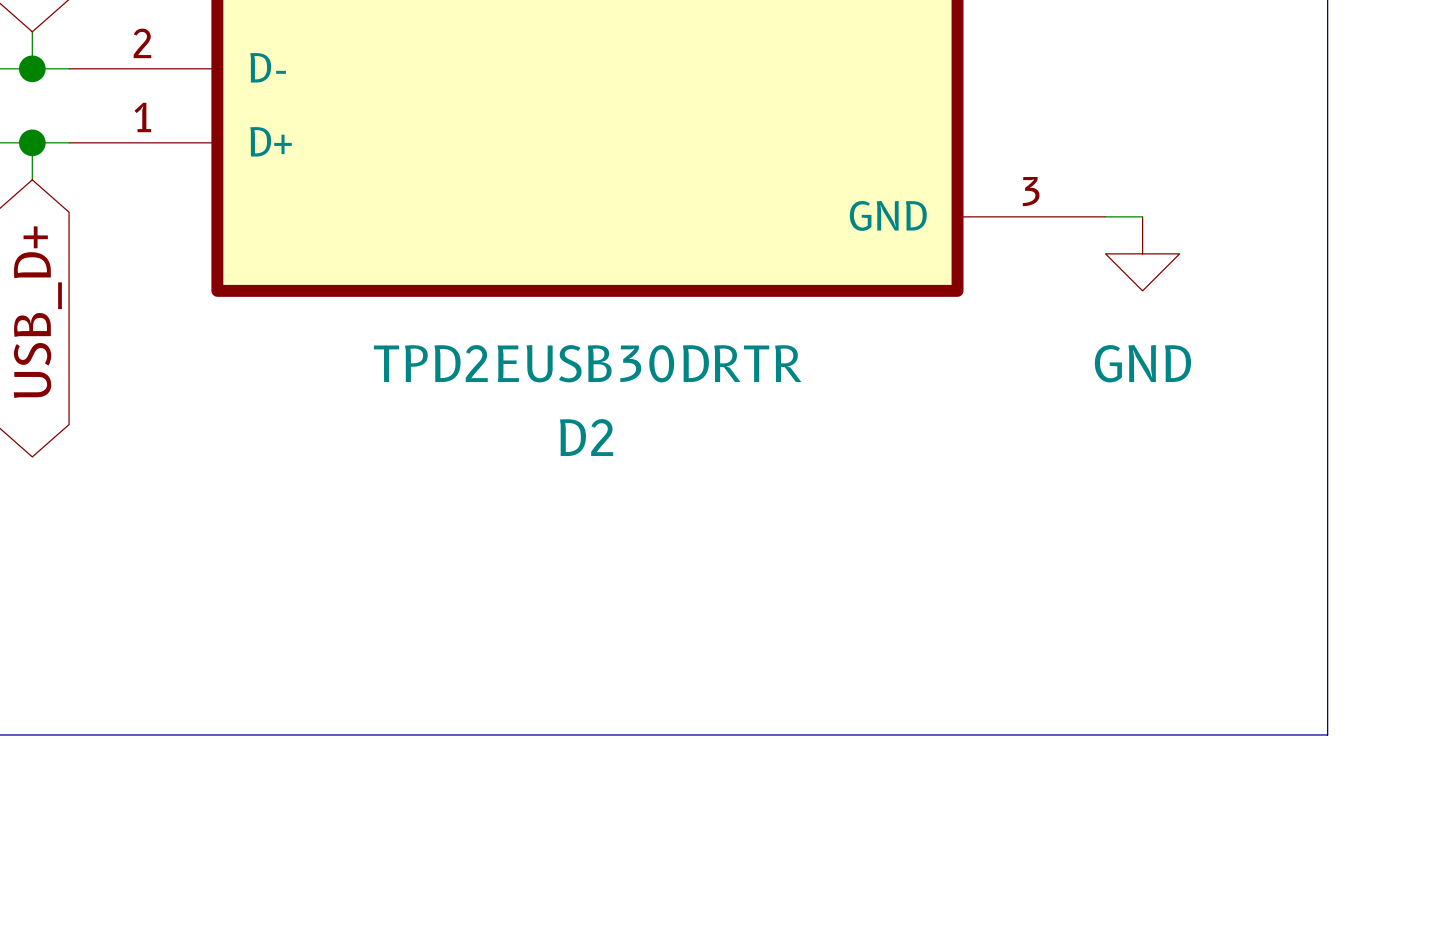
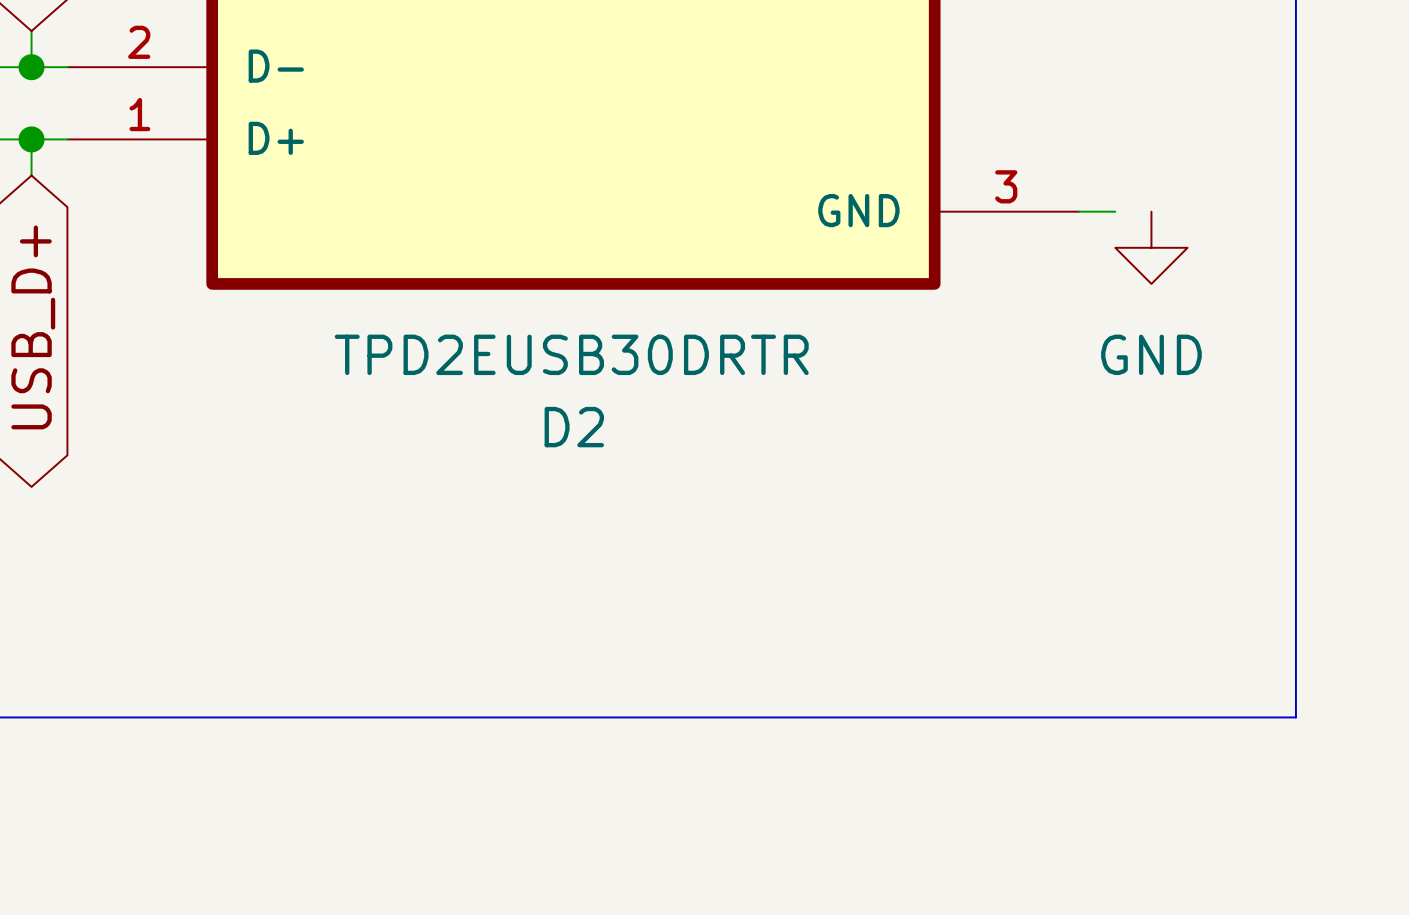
power symbol position: GND (1142, 253) -> GND (1151, 247)

